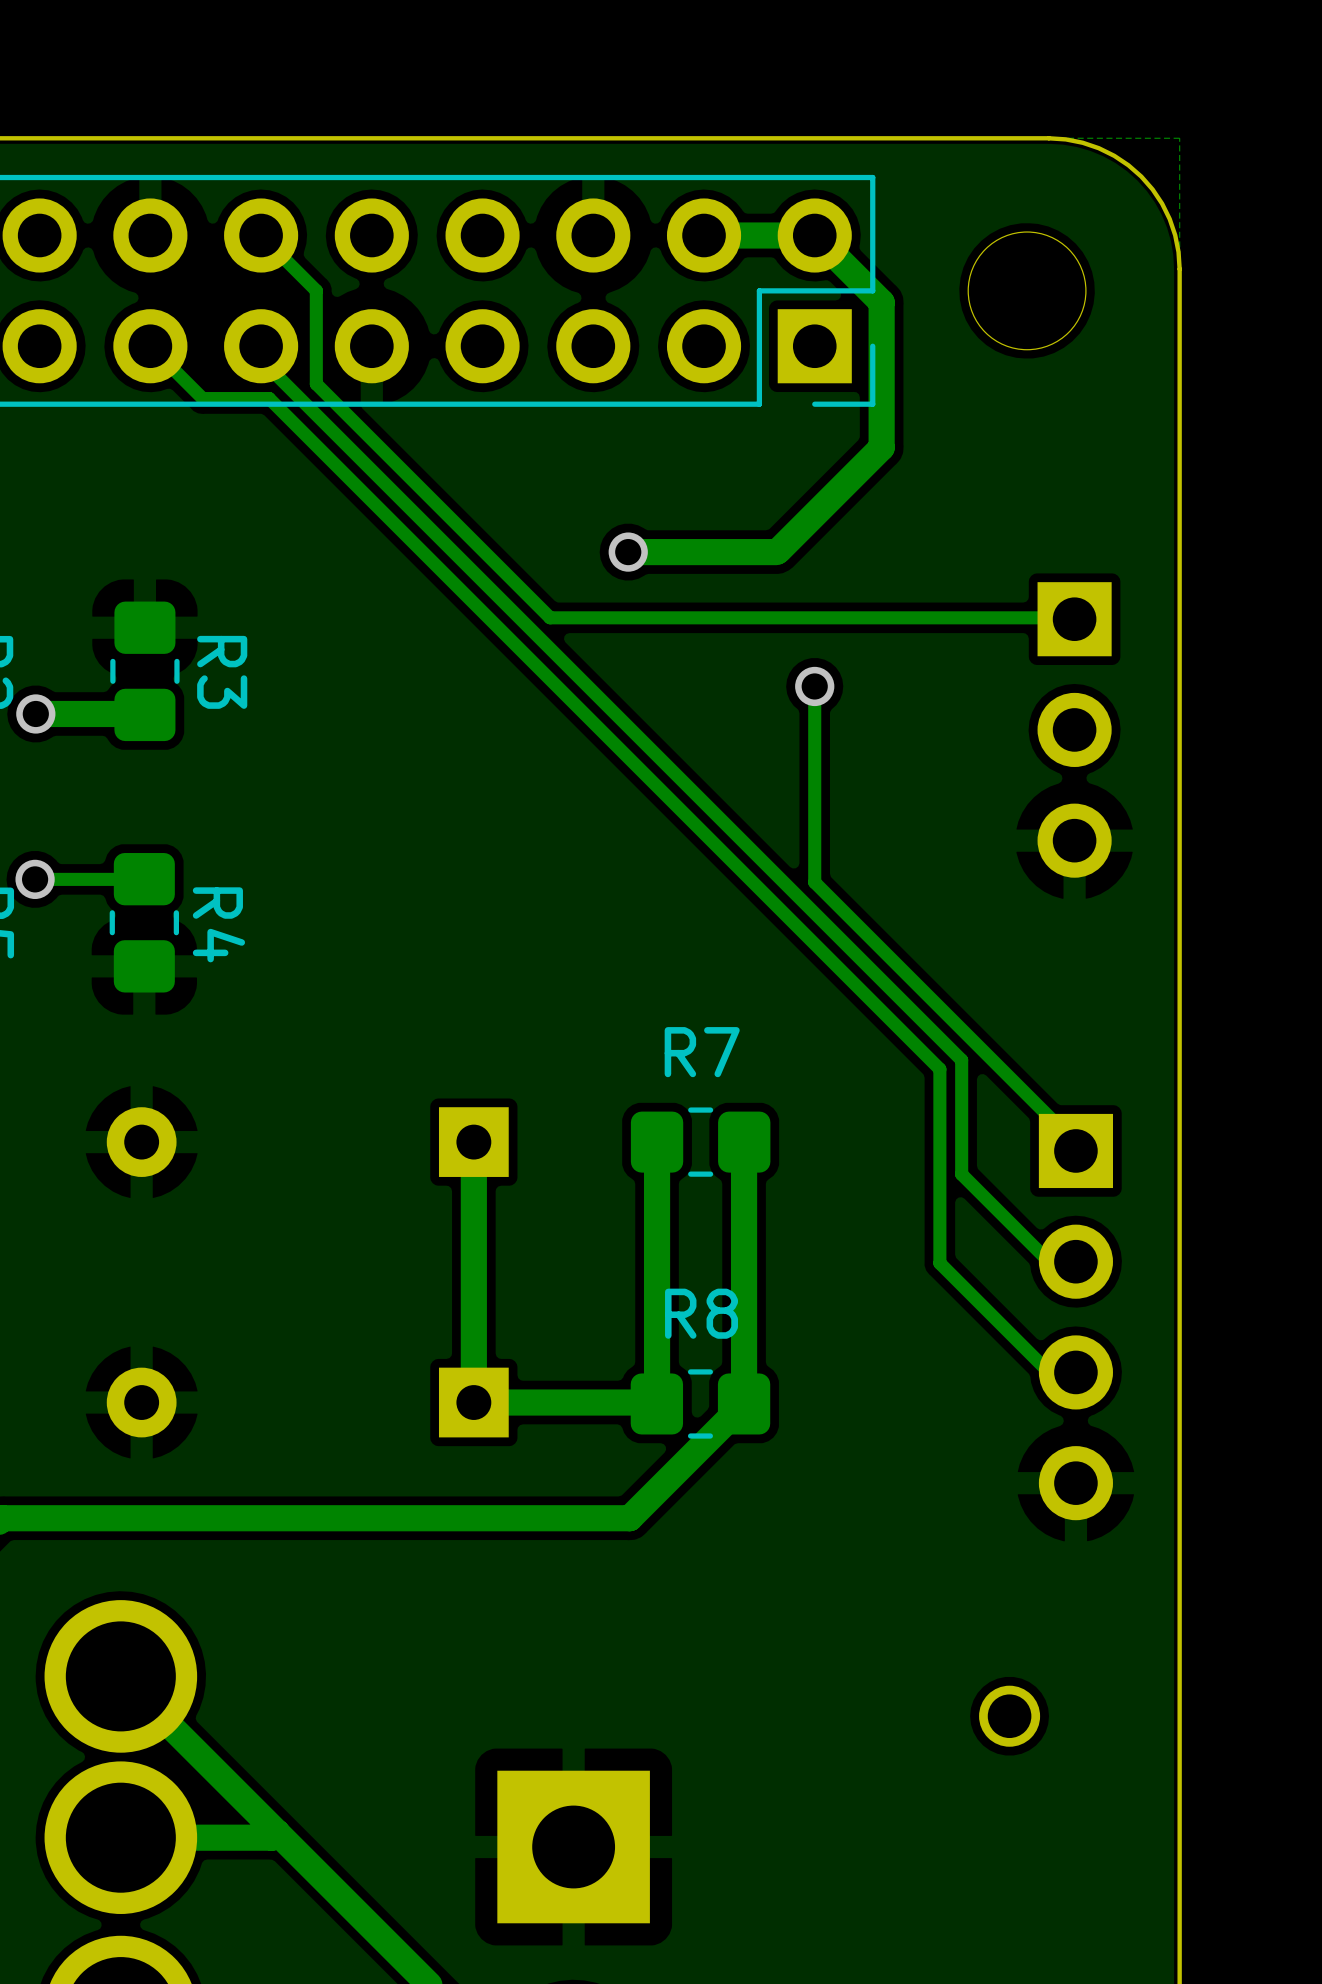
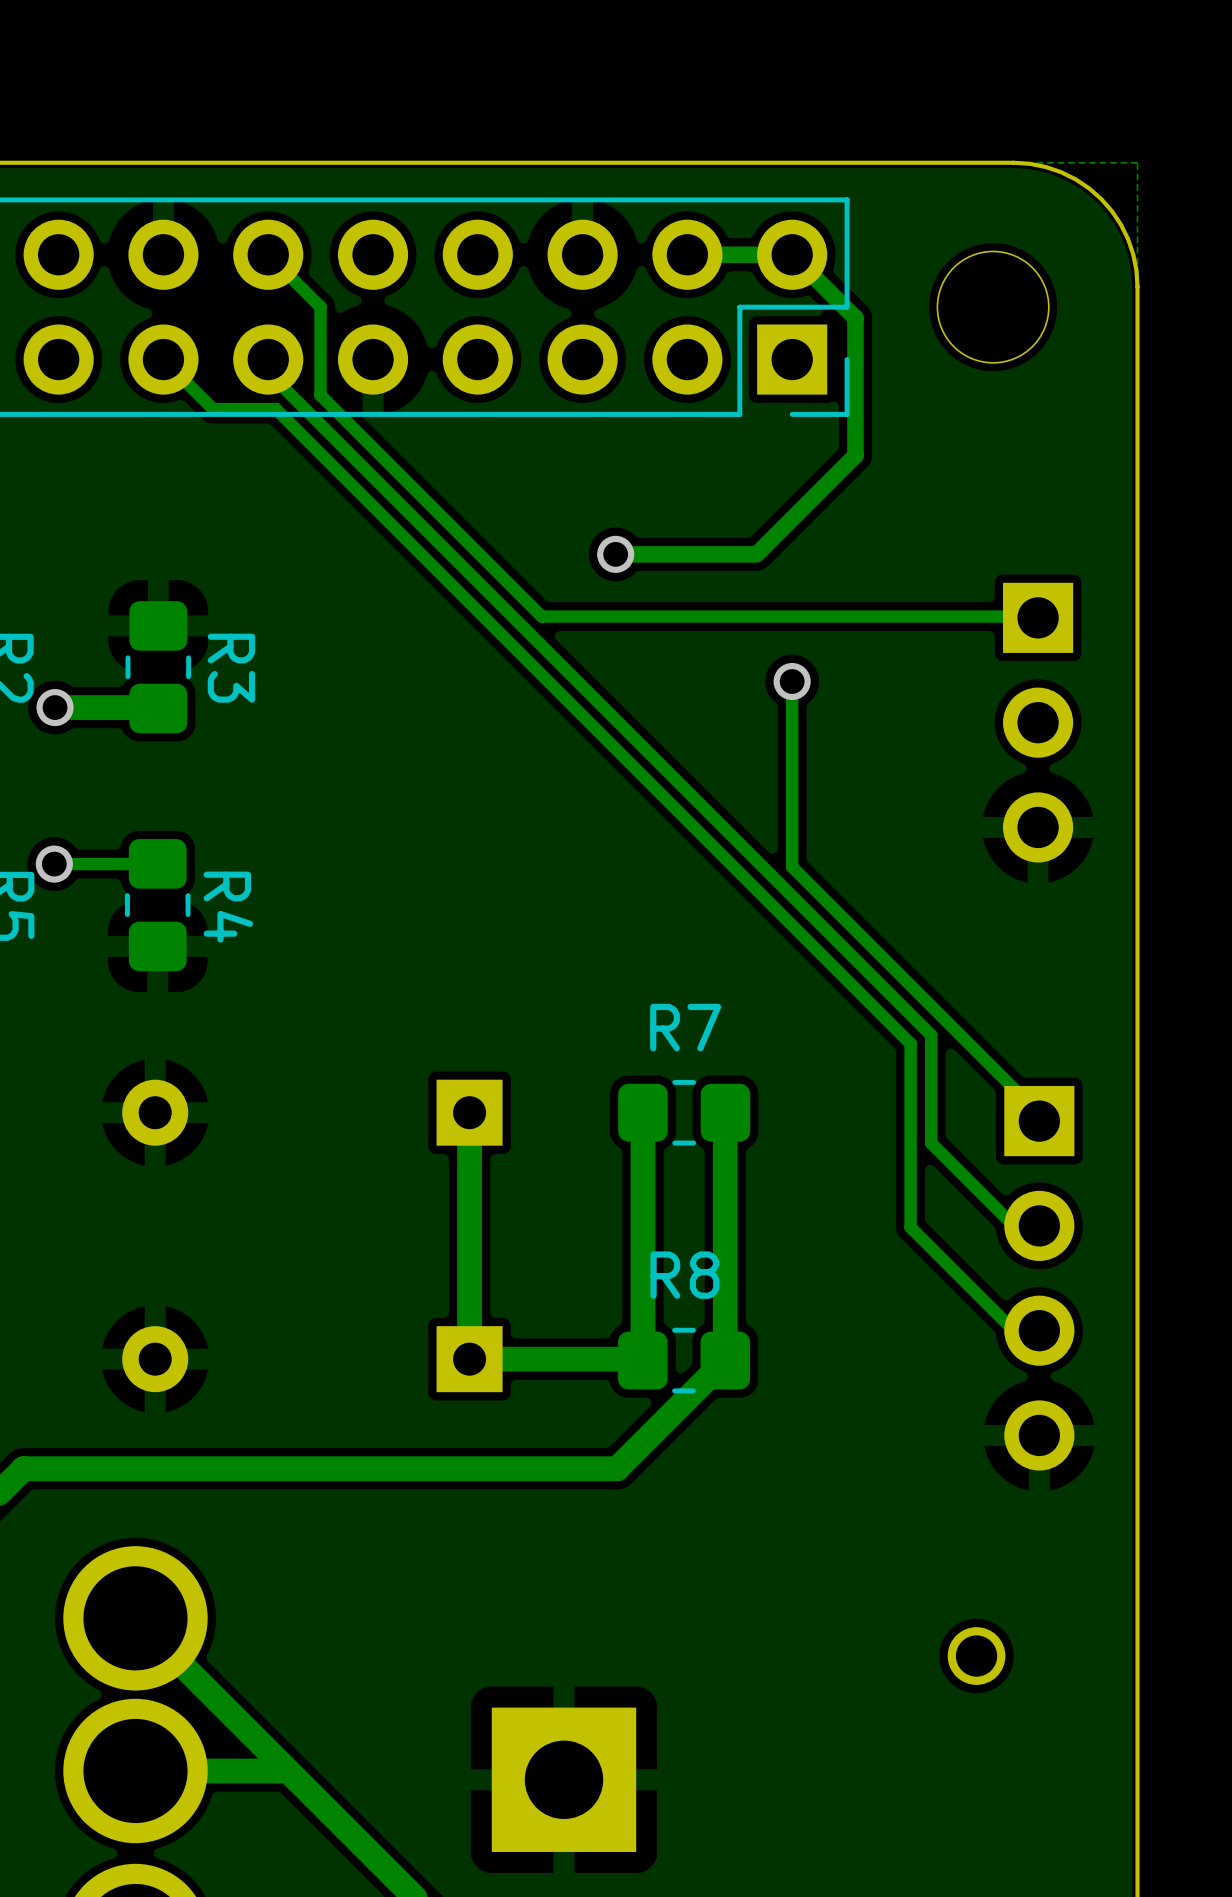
track width: thick (704, 235) (814, 235) (881, 302) (881, 447) (778, 550) -> thin (687, 254) (792, 254) (855, 318) (855, 455) (757, 553)
track width: thick (776, 552) (628, 552) -> thin (755, 554) (615, 554)

